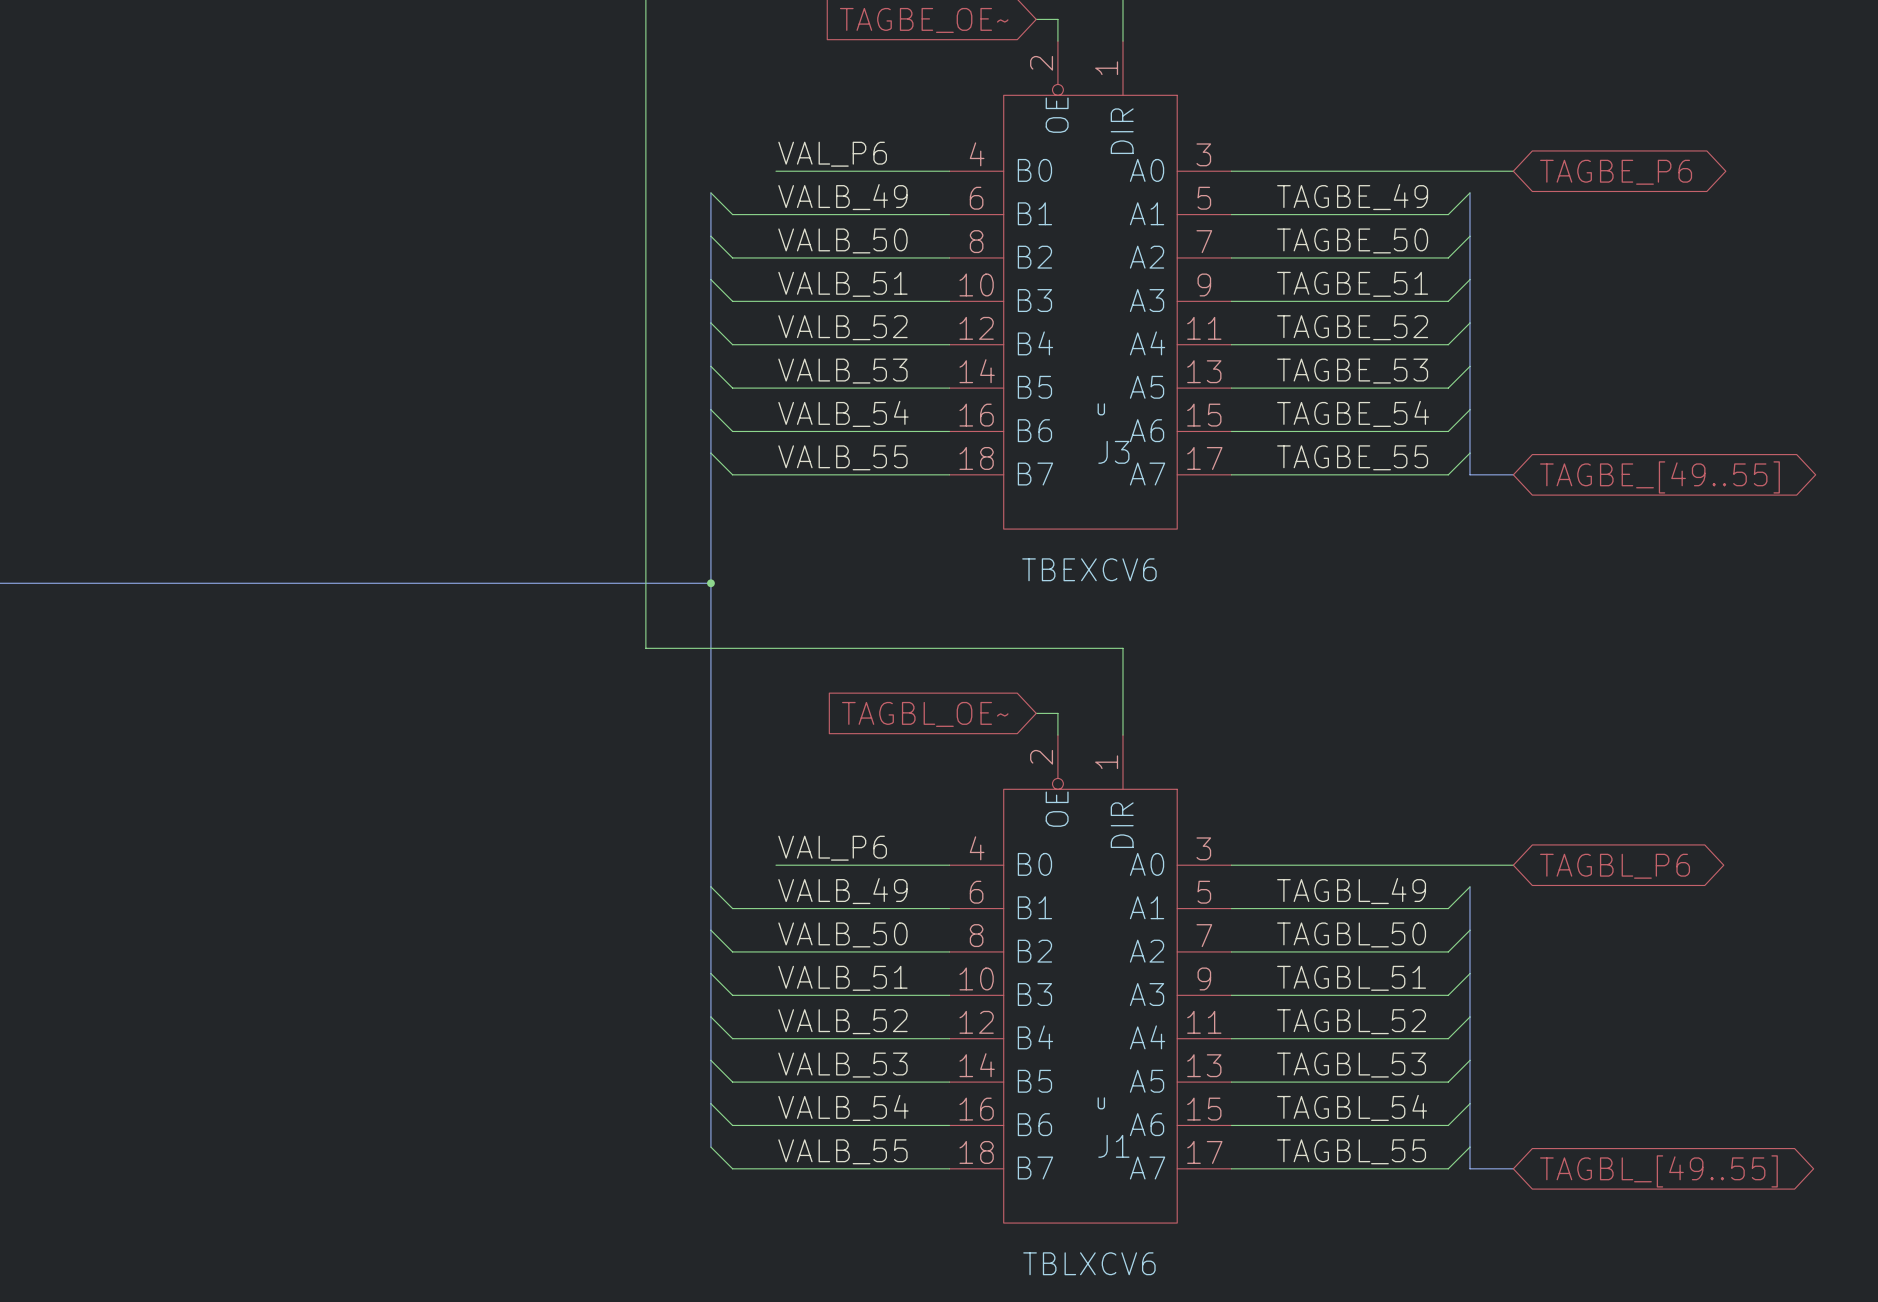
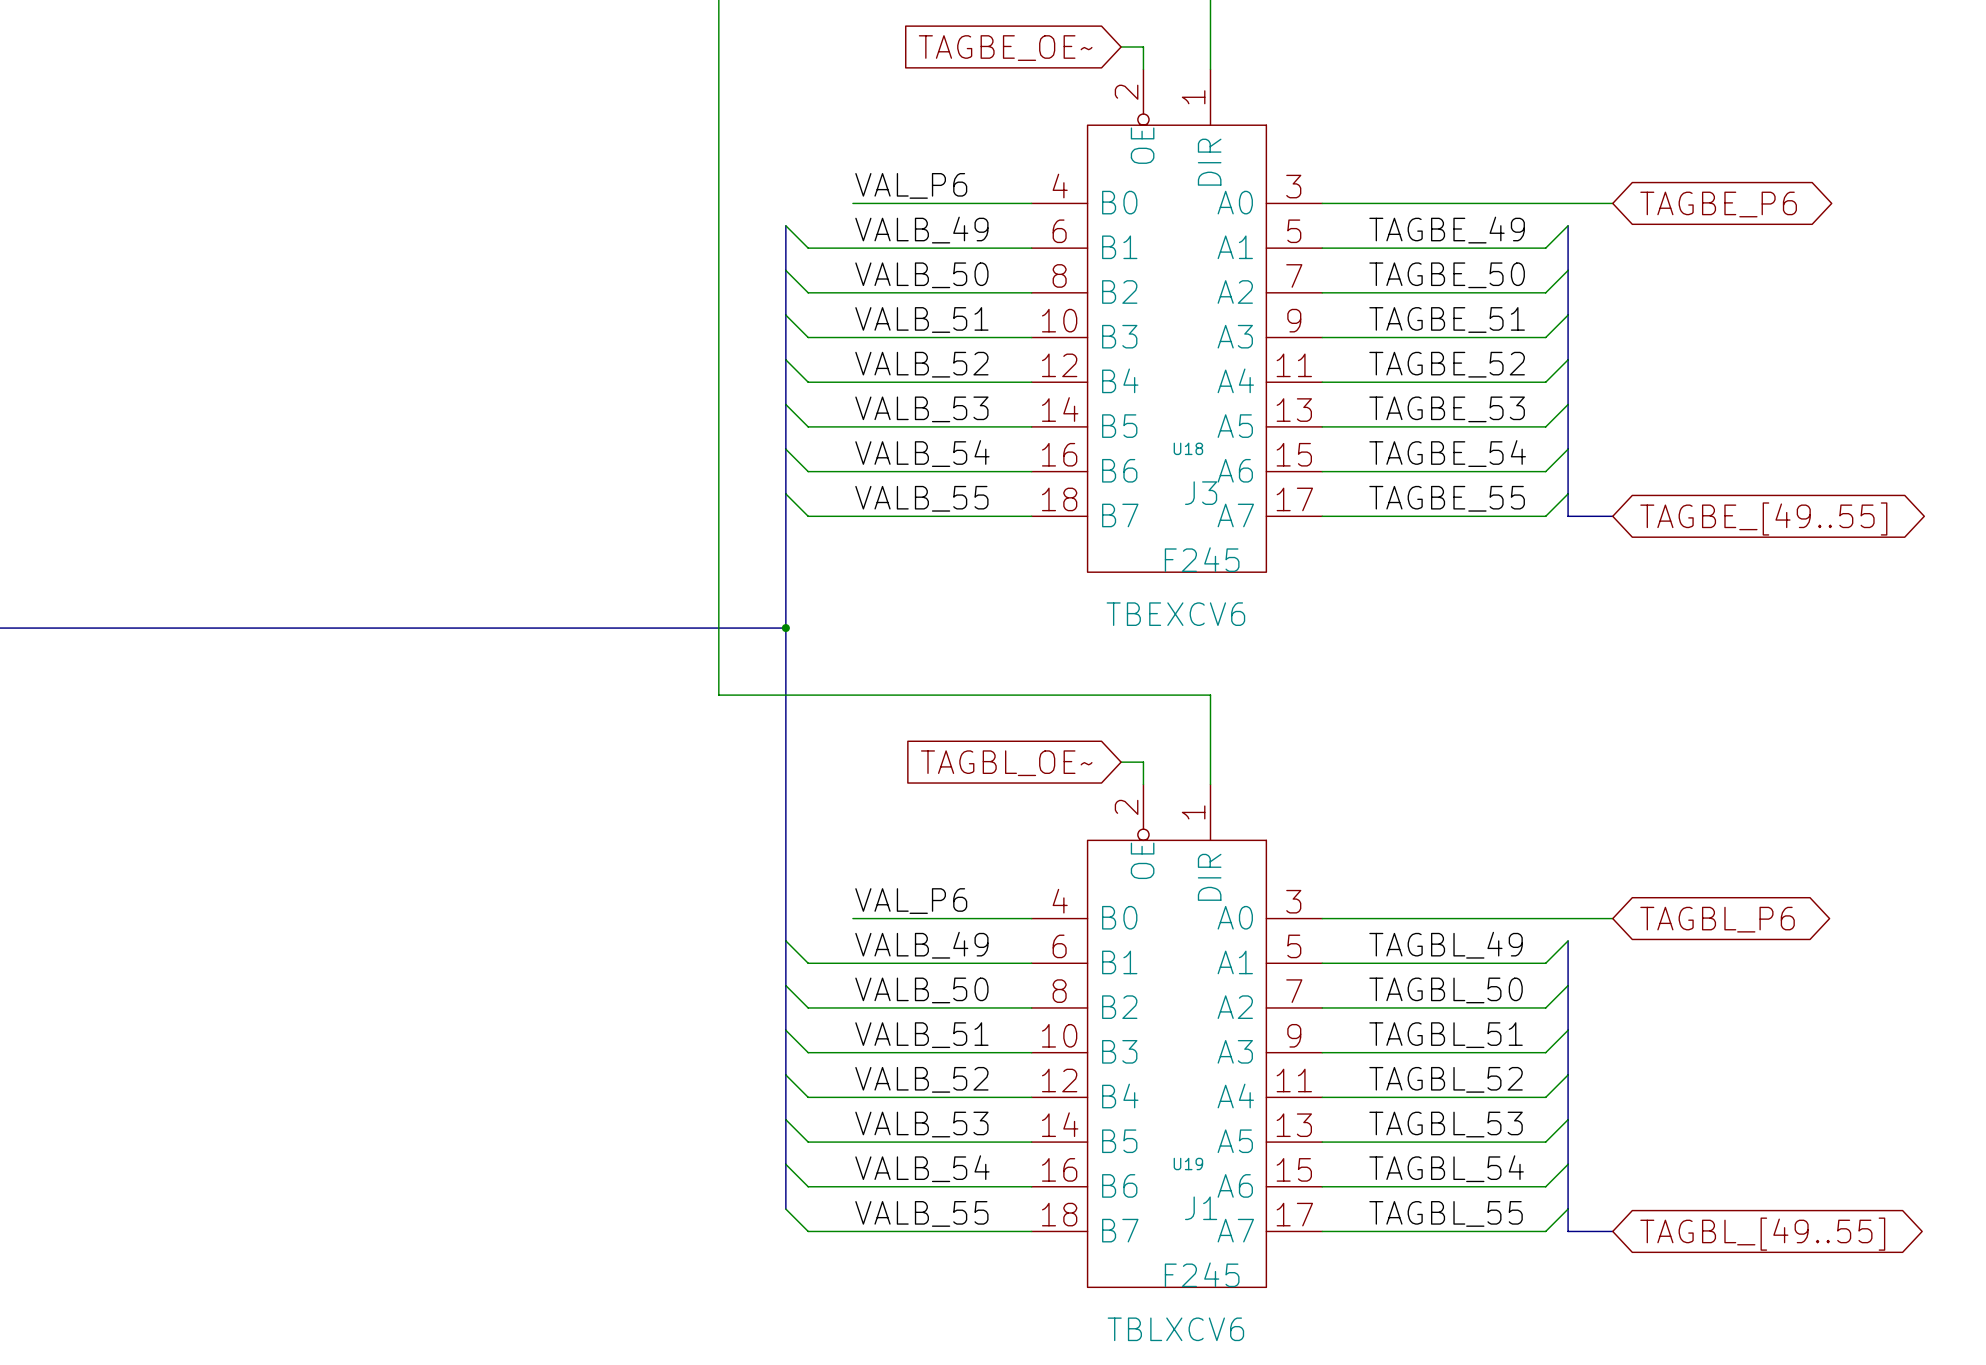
U name: U (1101, 409) -> U18 (1188, 448)
U value: none -> F245 (1202, 559)
U name: U (1101, 1103) -> U19 (1188, 1164)
U value: none -> F245 (1202, 1274)

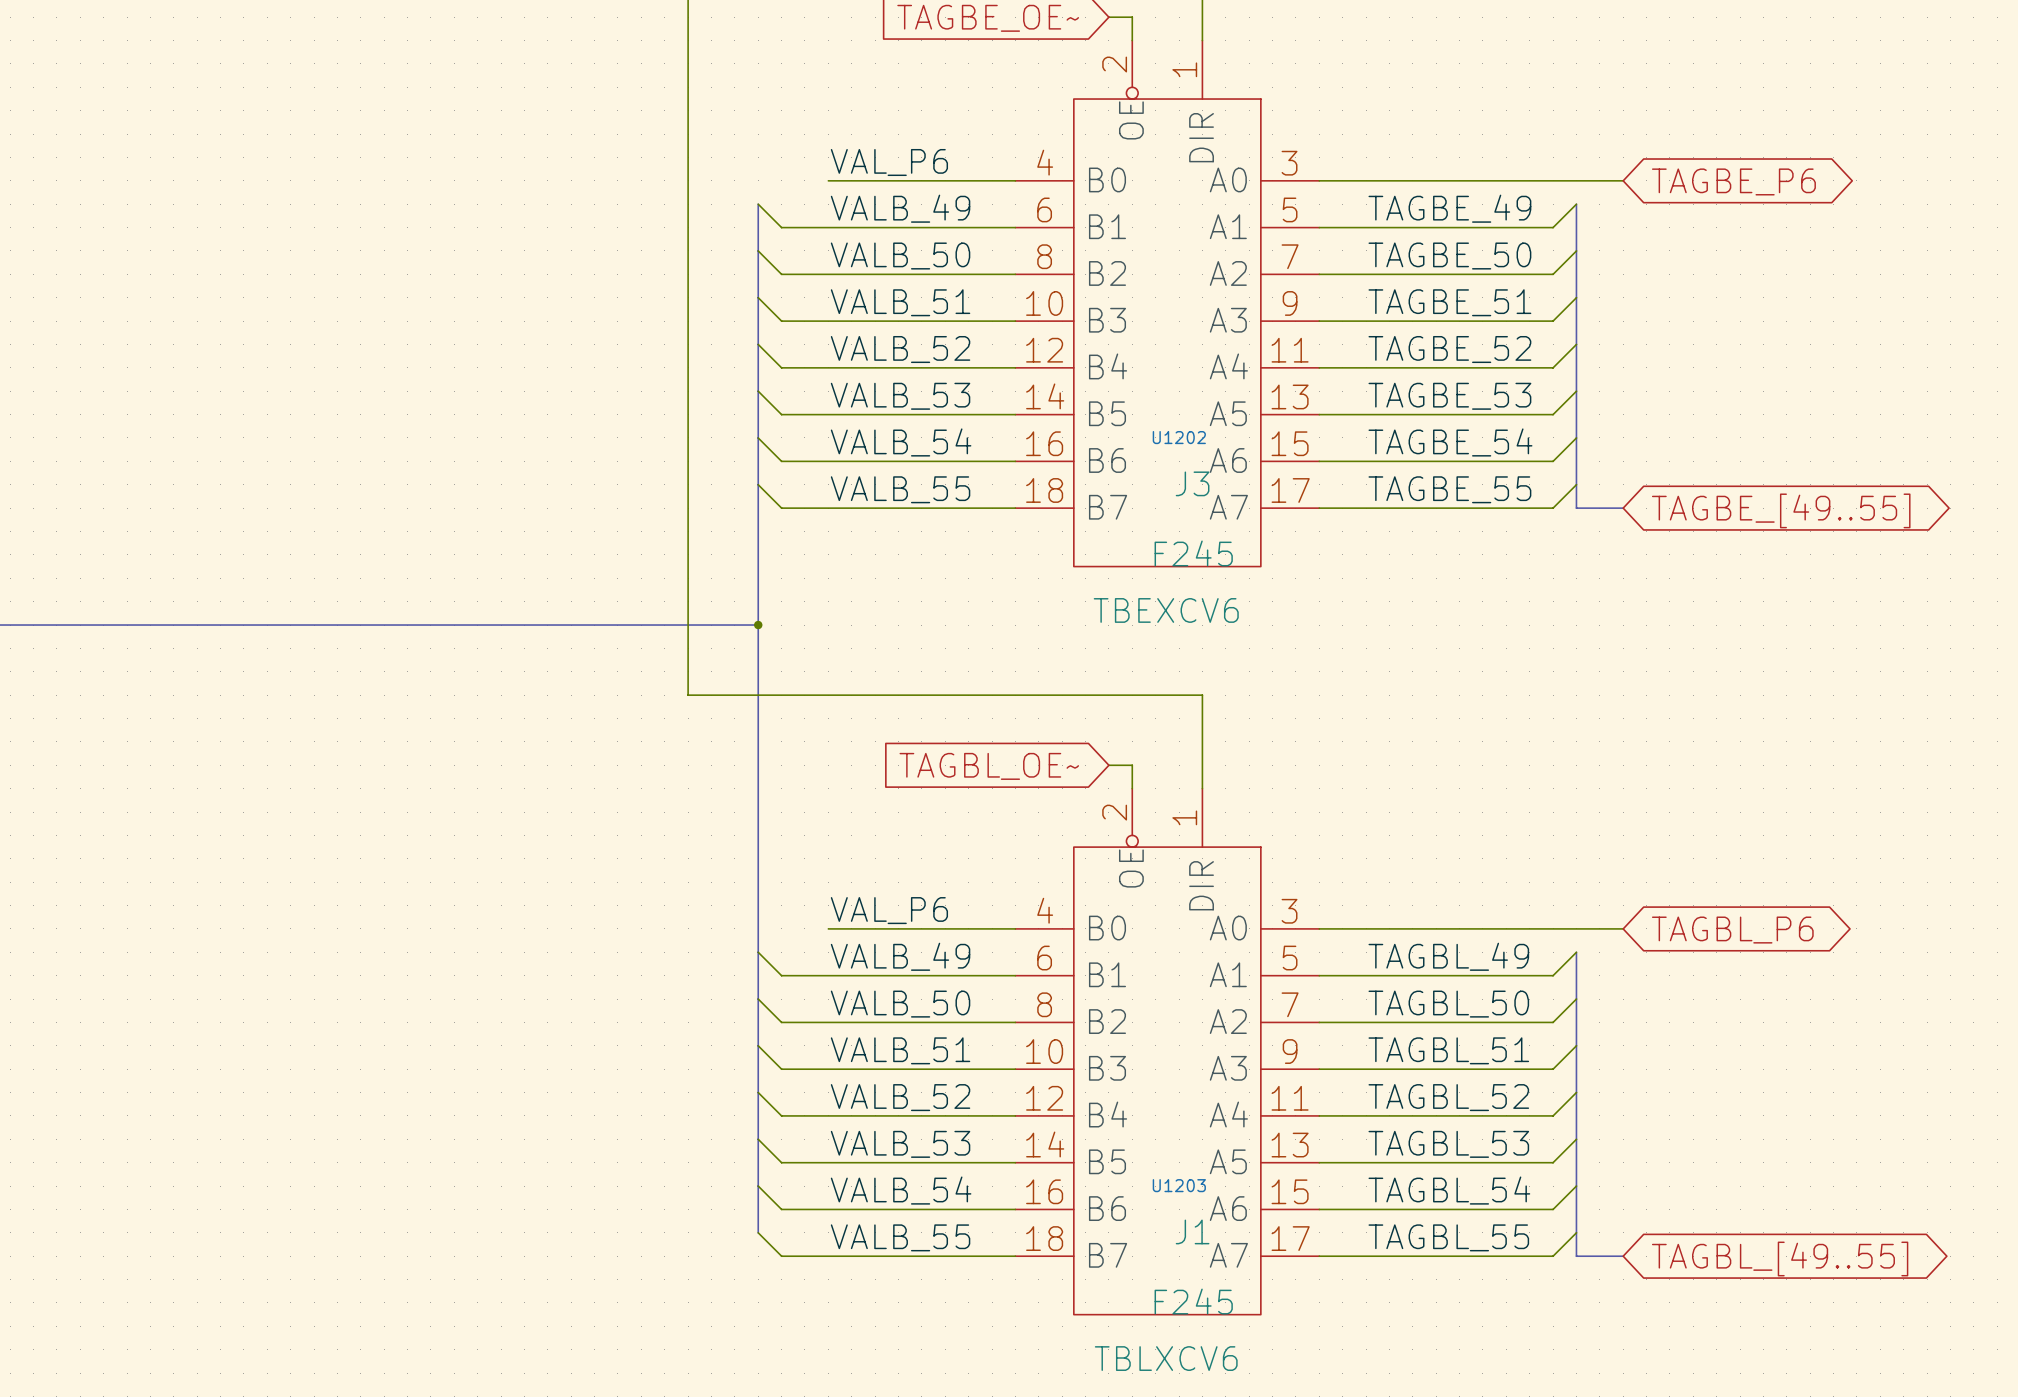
U18 name: U18 (1188, 448) -> U1202 (1179, 437)
U19 name: U19 (1188, 1164) -> U1203 (1179, 1185)

